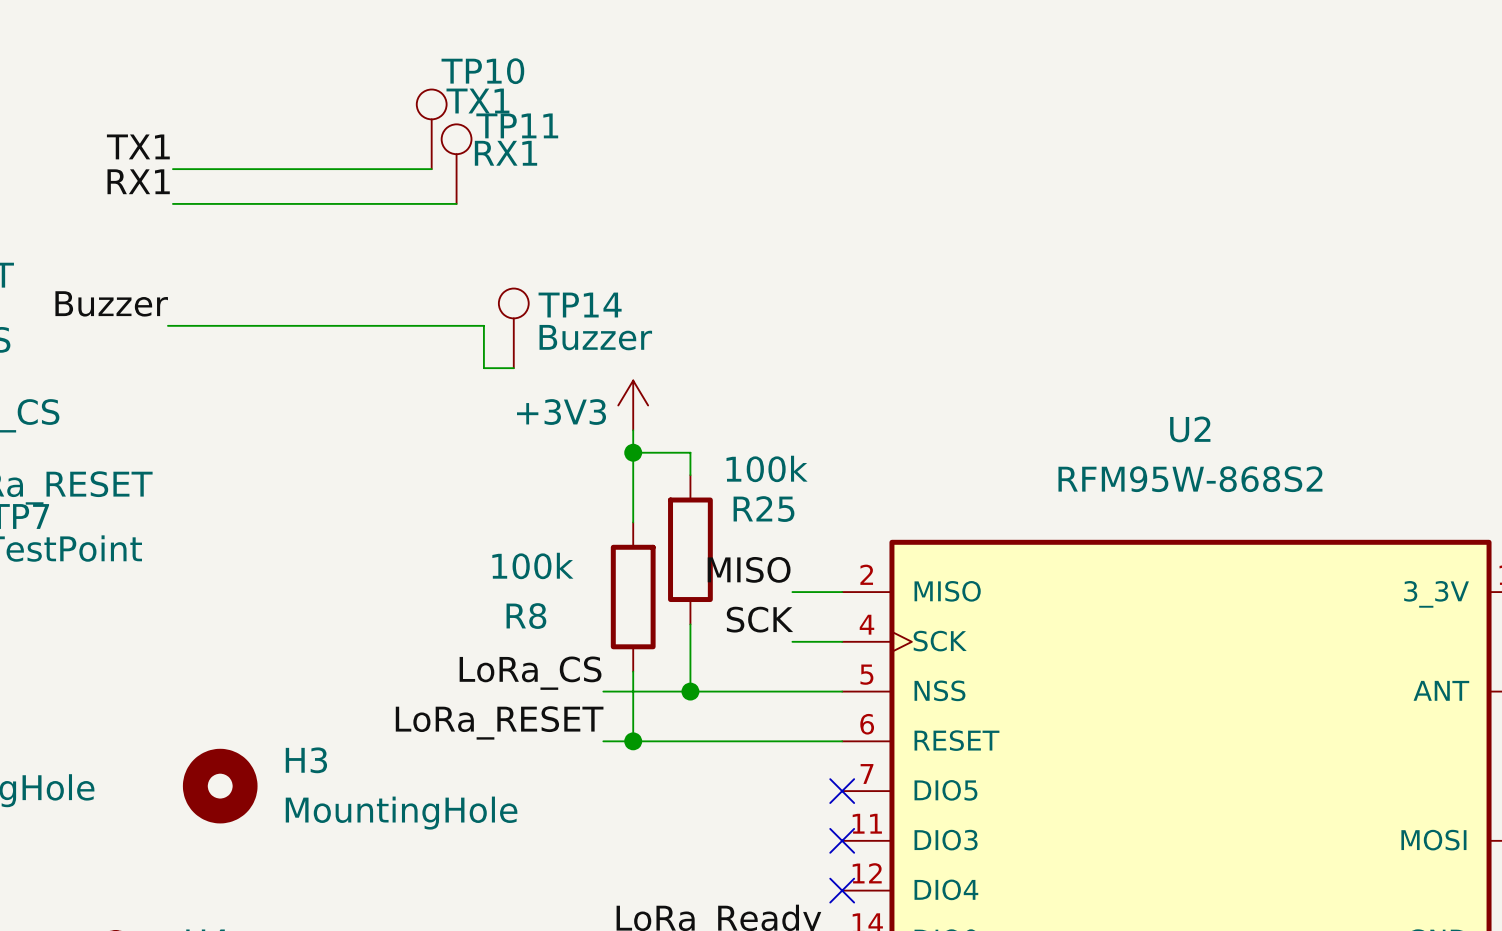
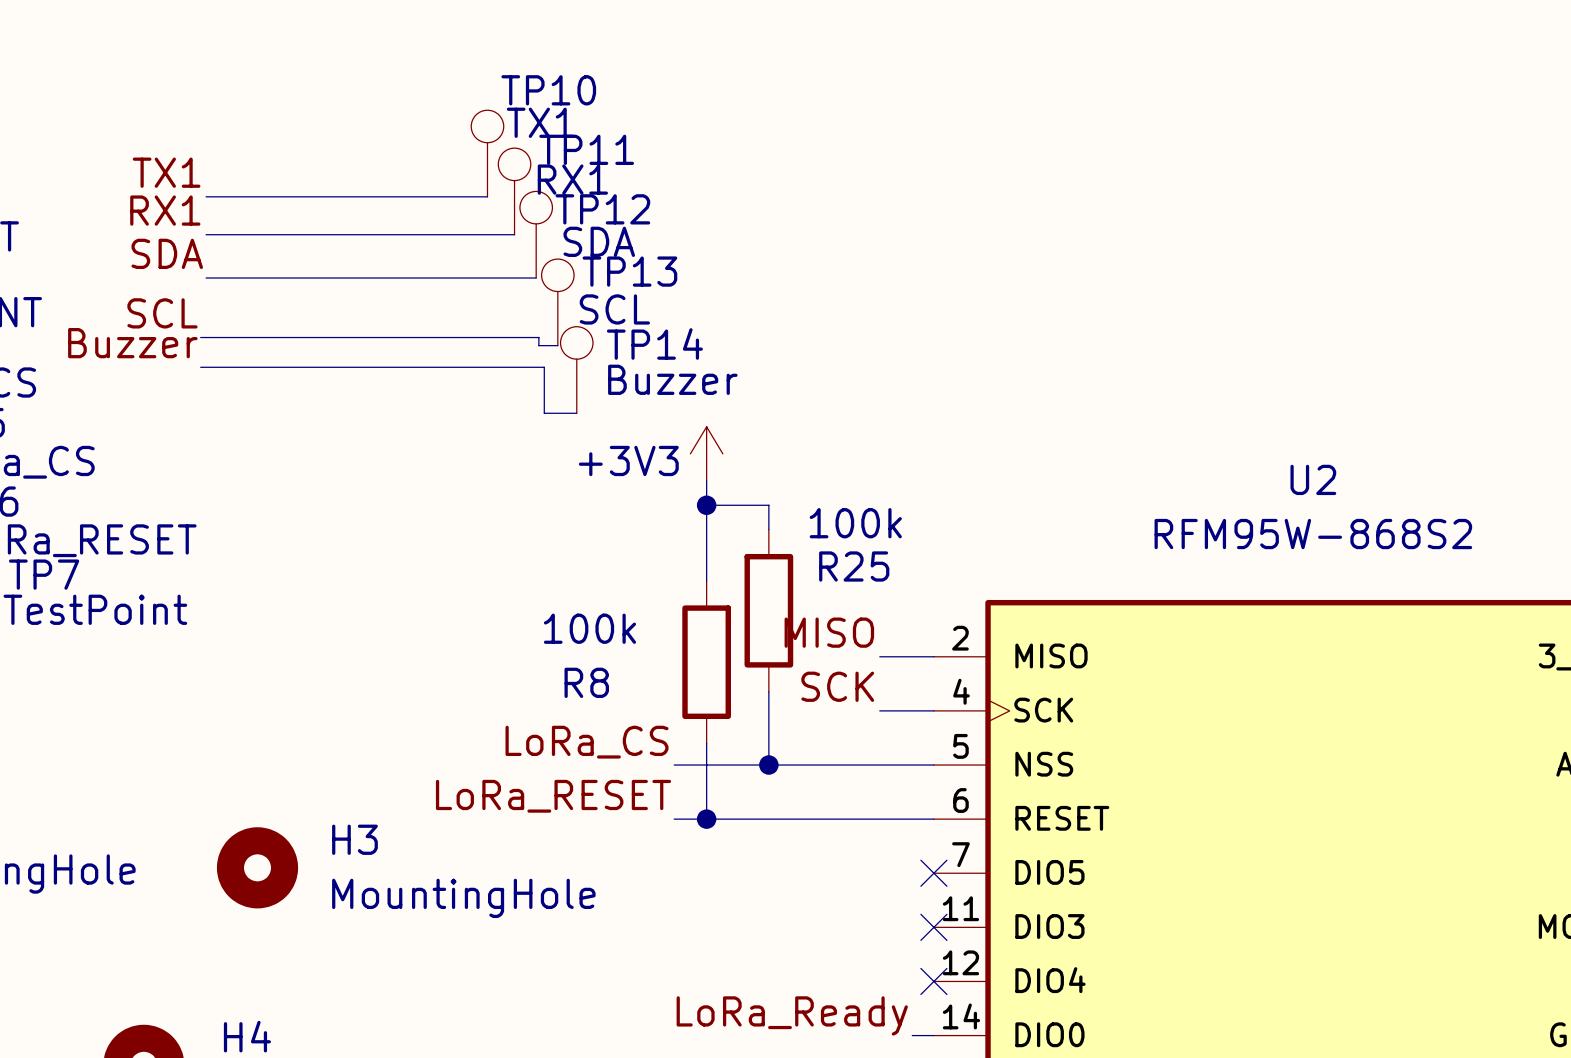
TP12: none -> SDA (536, 234)
label: none -> SDA (167, 253)
wire: none -> (206, 278) (536, 278)
TP13: none -> SCL (557, 302)
label: none -> SCL (162, 313)
wire: none -> (200, 337) (538, 337) (538, 345) (557, 345)

